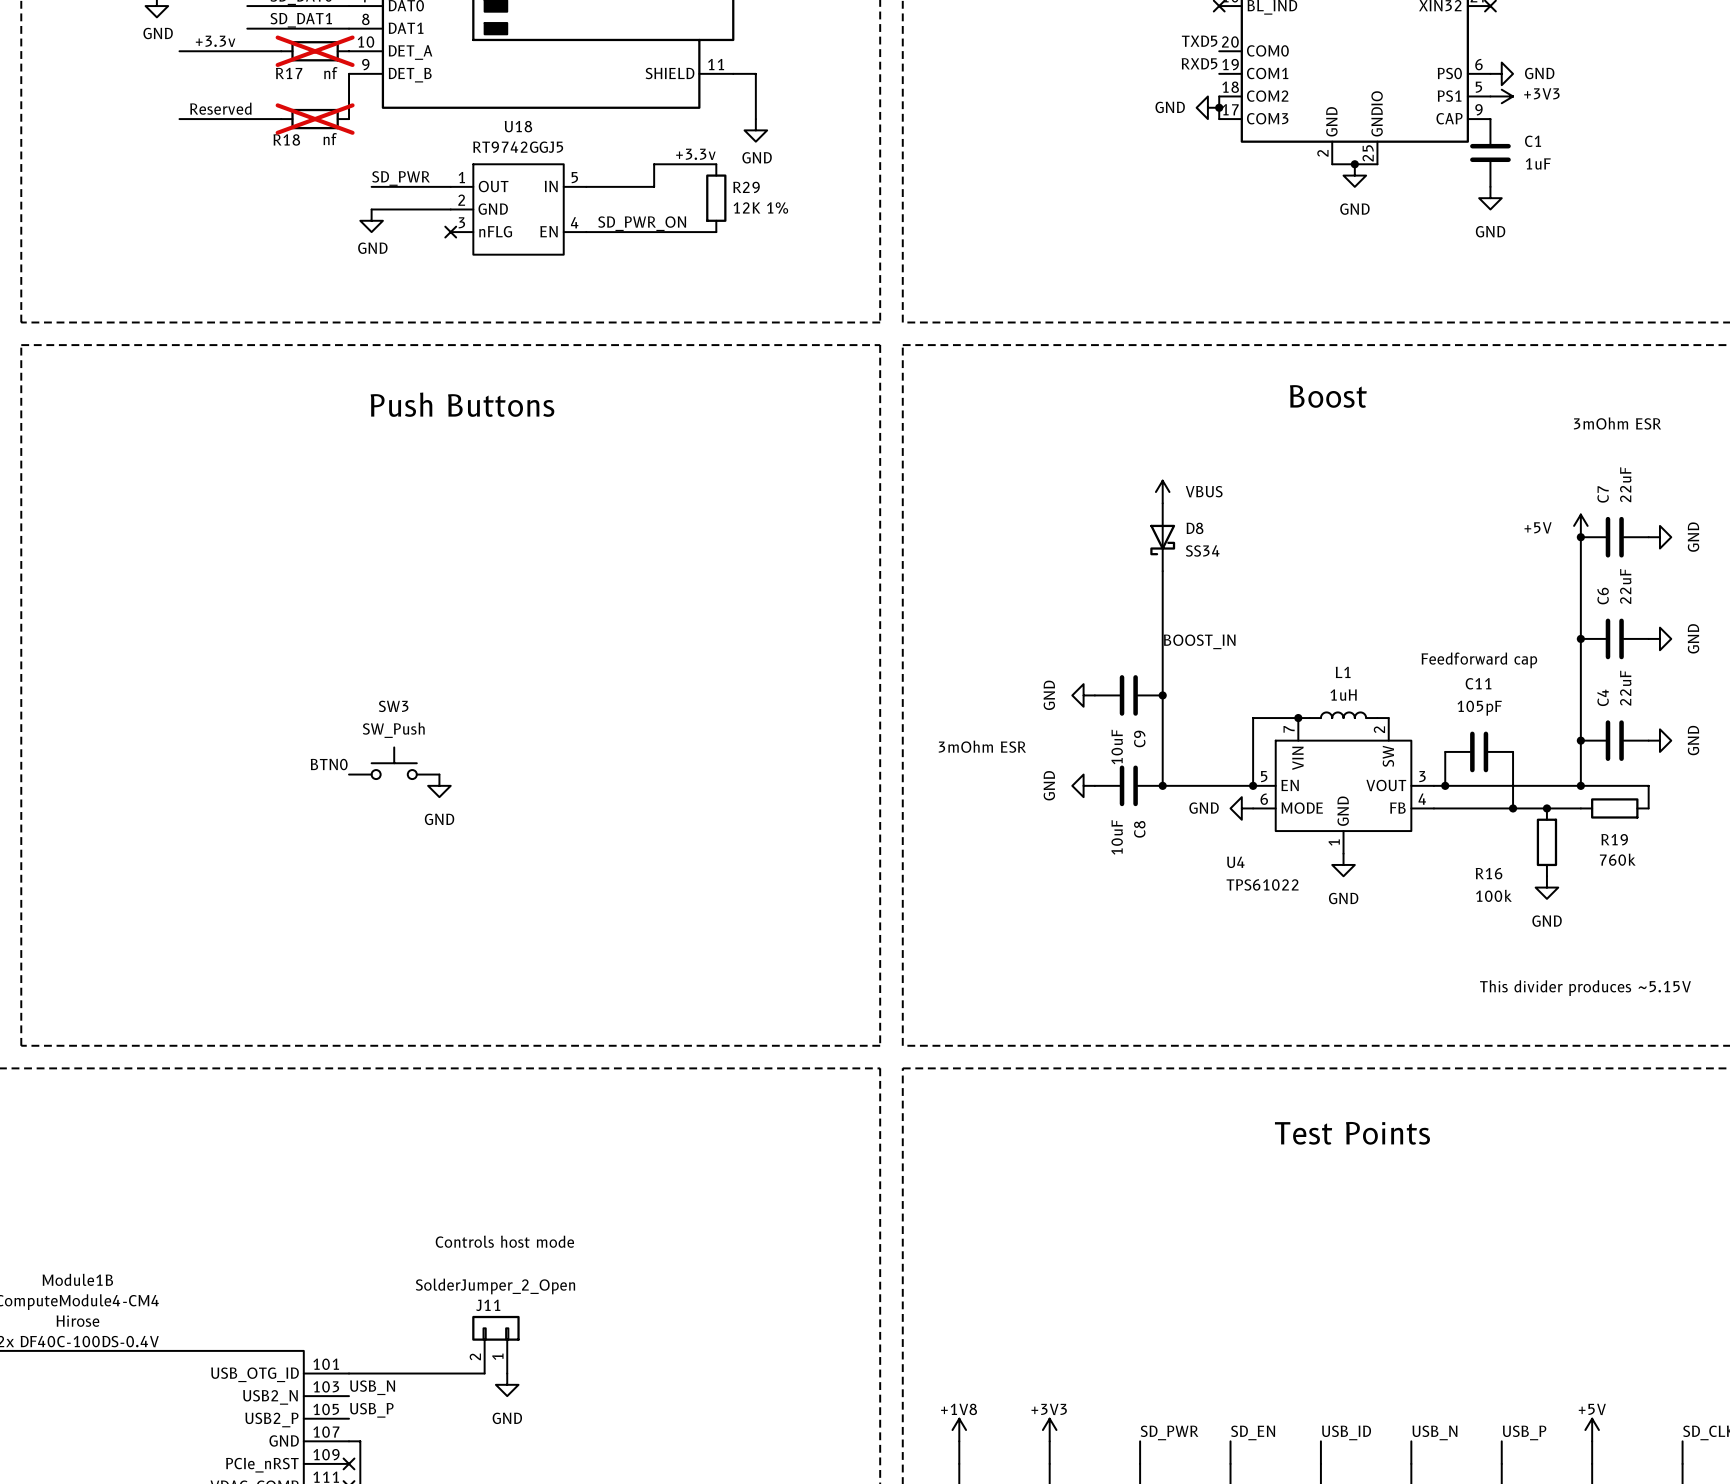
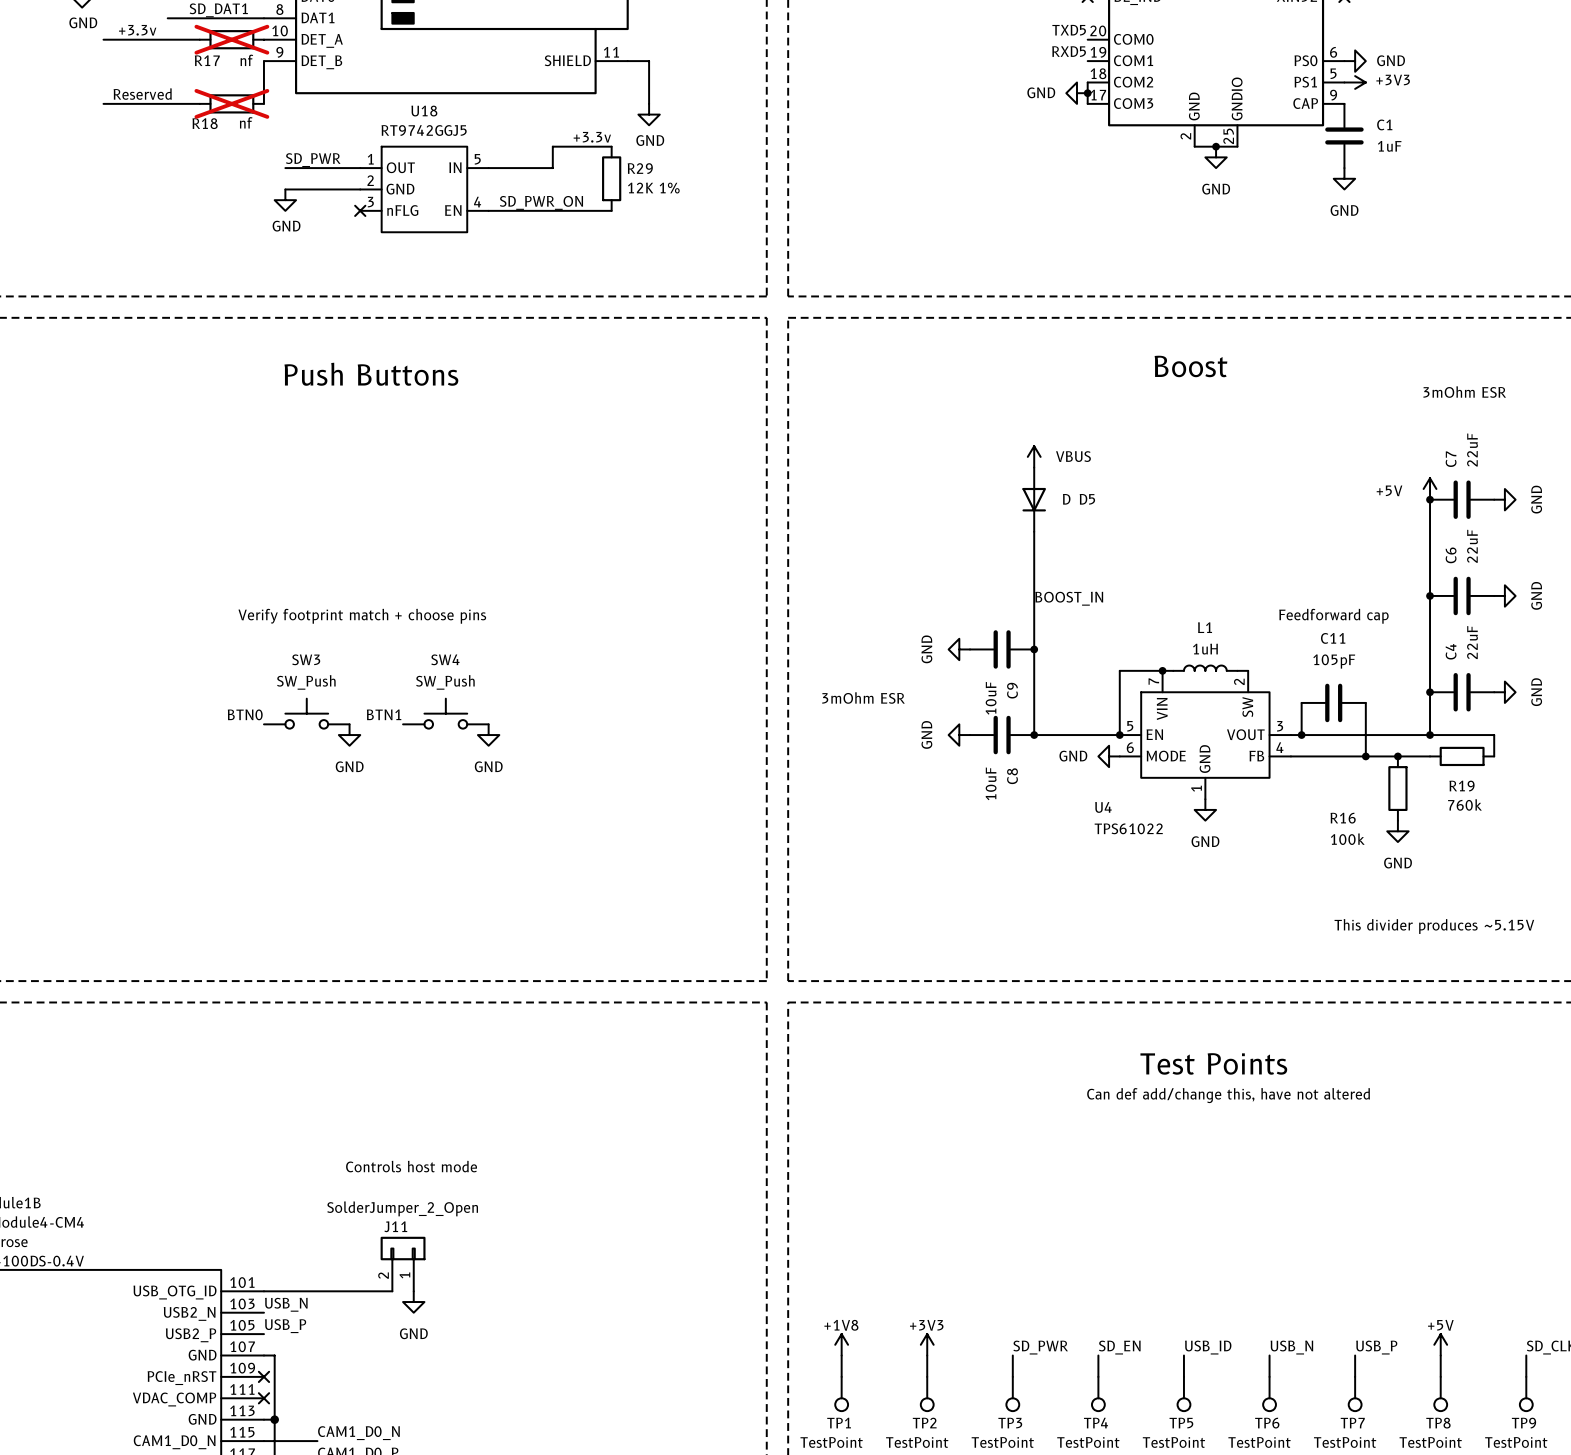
D8: SS34 (1162, 537) -> none
D5: none -> D (1034, 499)
text: none -> Verify footprint match + choose pins (362, 616)
SW4: none -> SW_Push (445, 713)
label: none -> BTN1 (384, 714)
power symbol: none -> GND (488, 735)
text: none -> Can def add/change this, have not altered (1228, 1095)

